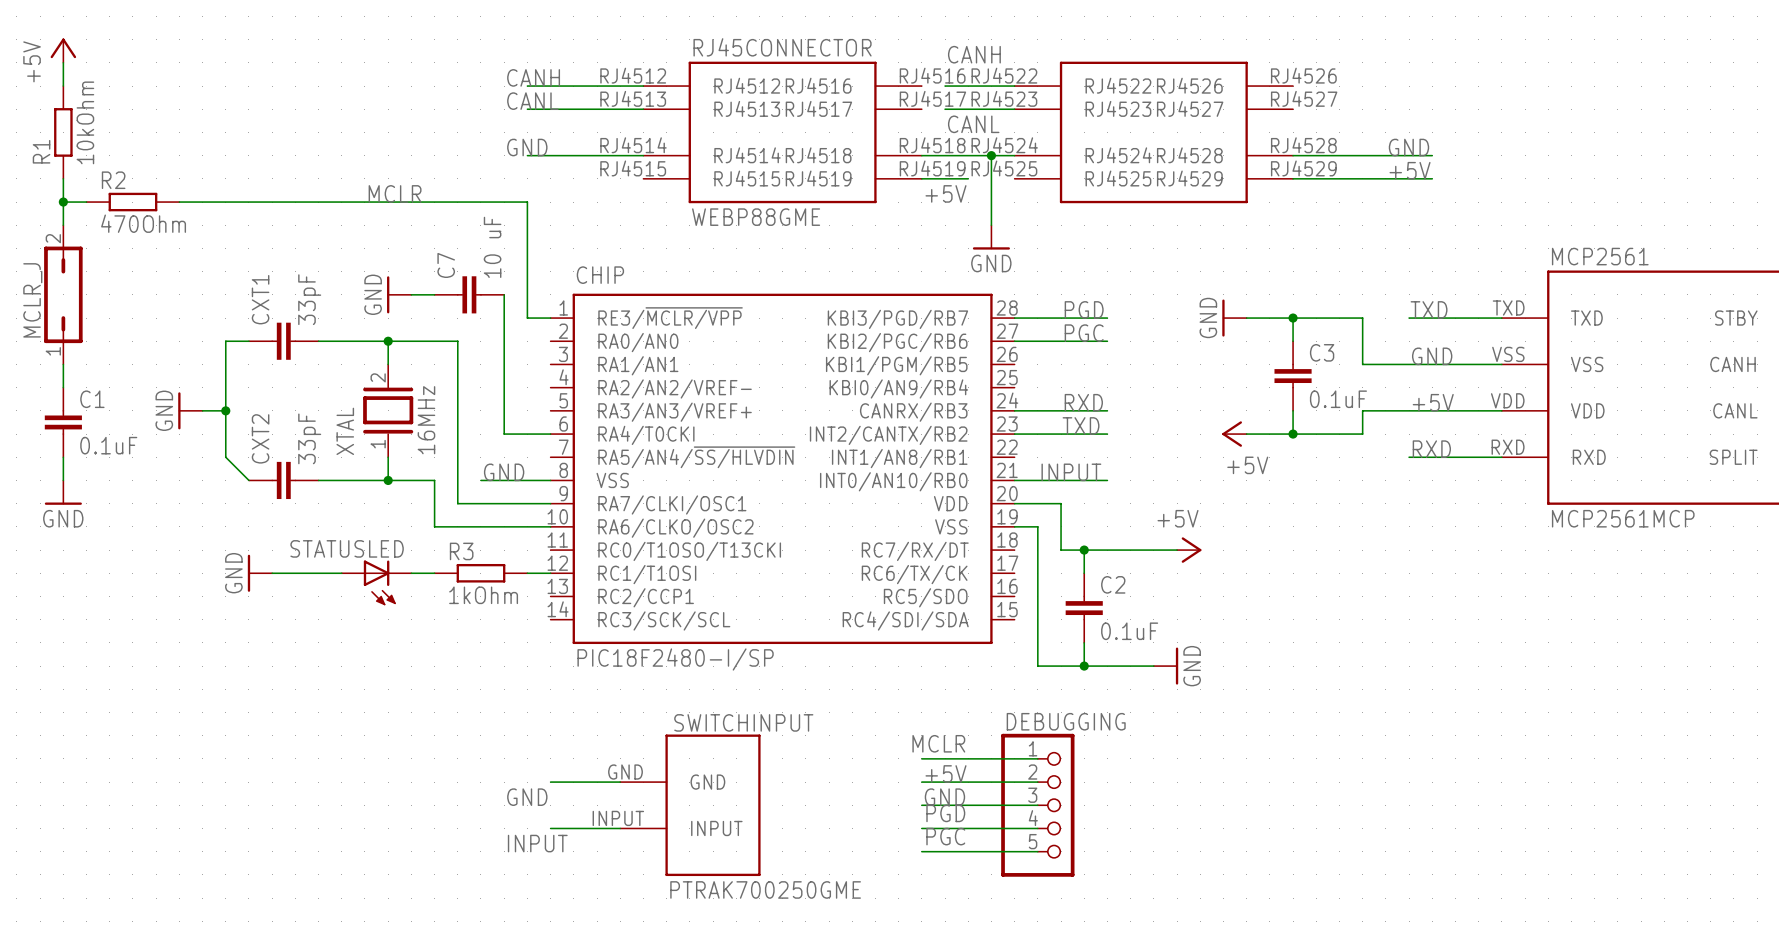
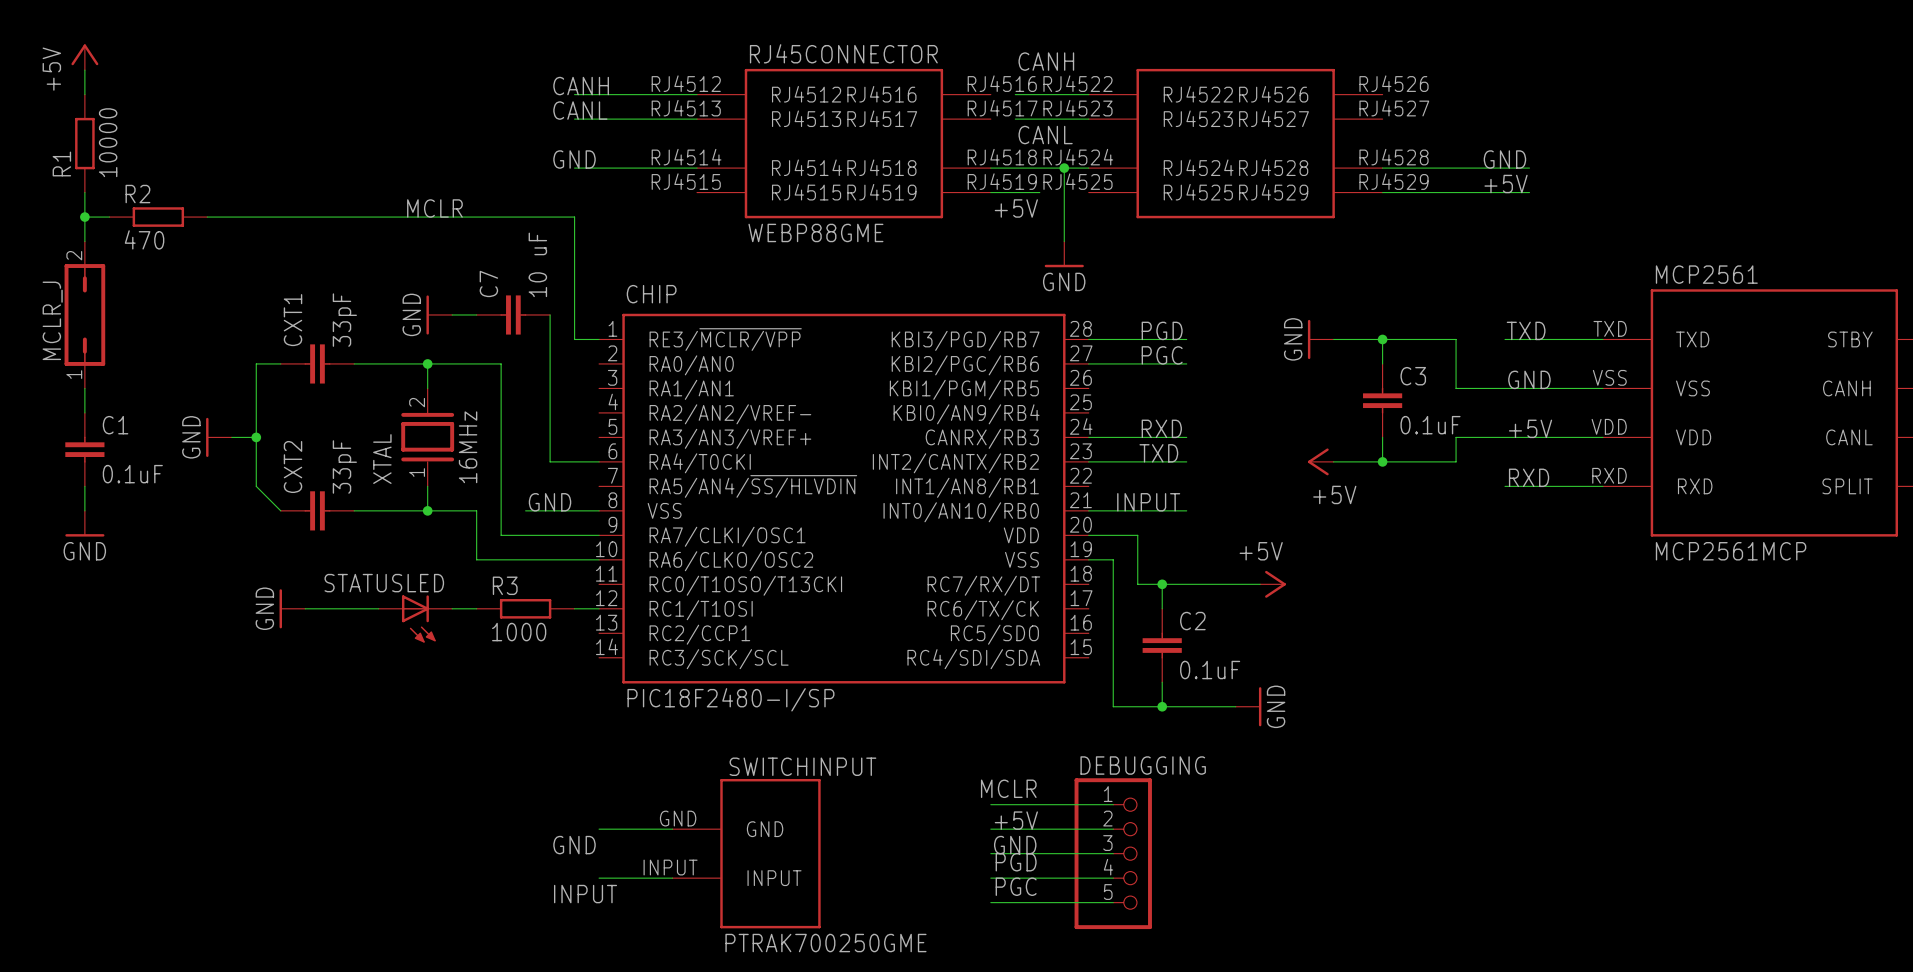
R1 value: 10kOhm (85, 122) -> 10000 (108, 142)
R2 value: 470Ohm (143, 223) -> 470 (144, 239)
R3 value: 1kOhm (483, 595) -> 1000 (519, 632)

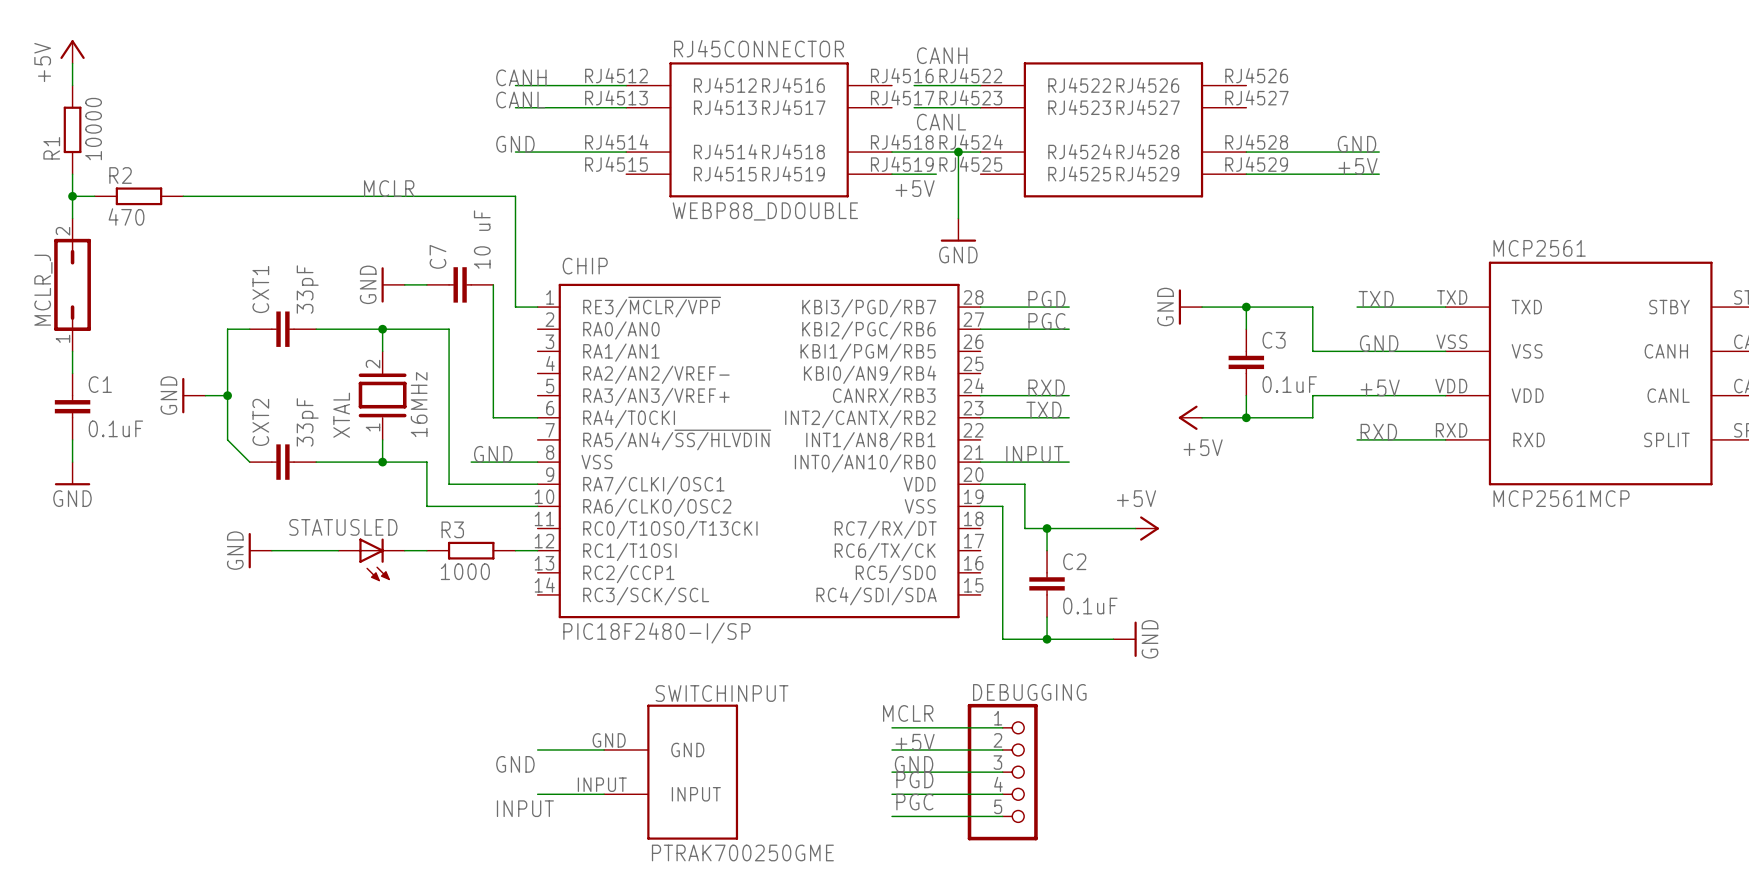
RJ45CONNECTOR value: WEBP88GME (815, 232) -> WEBP88_DDOUBLE (765, 211)

